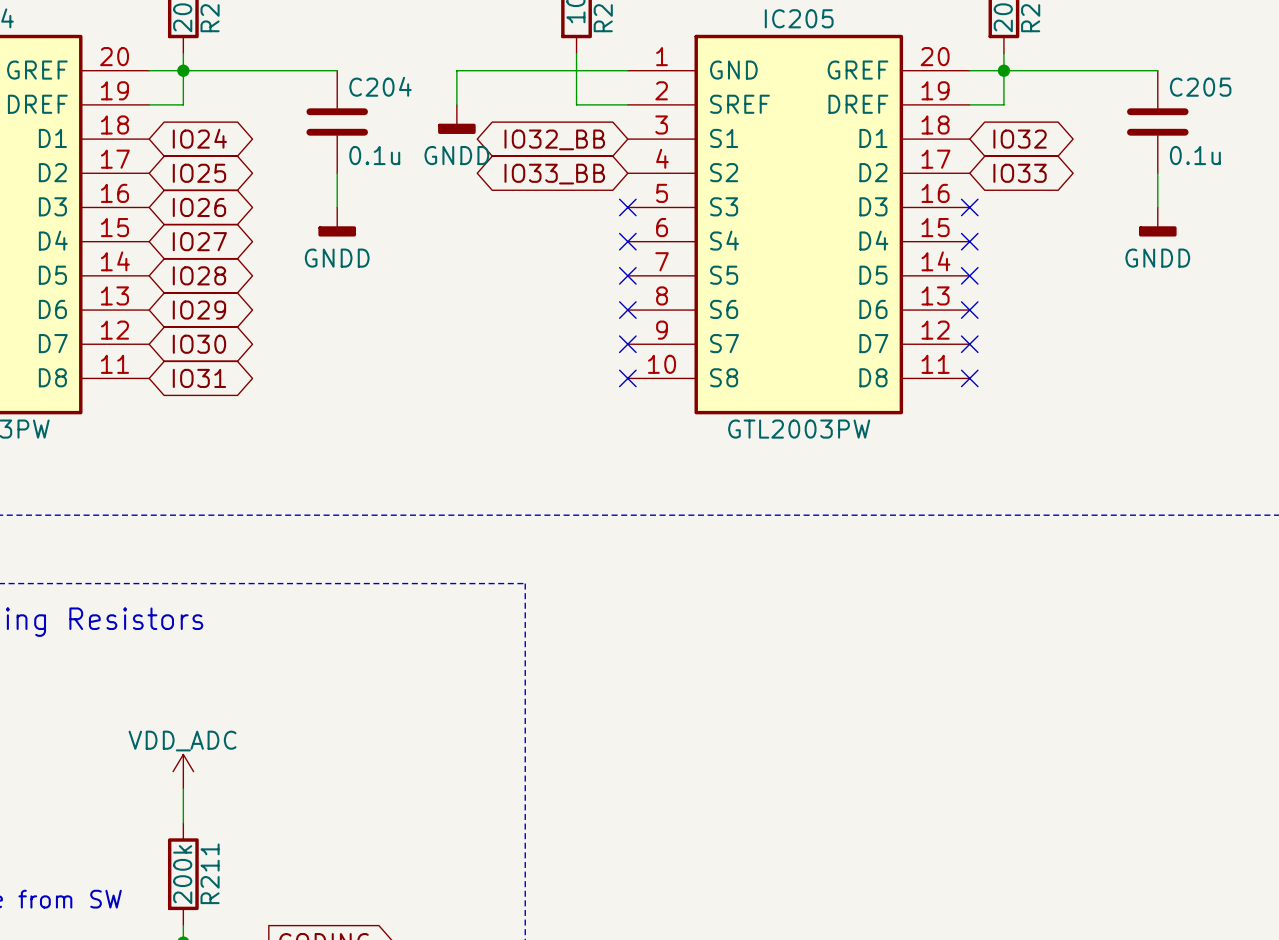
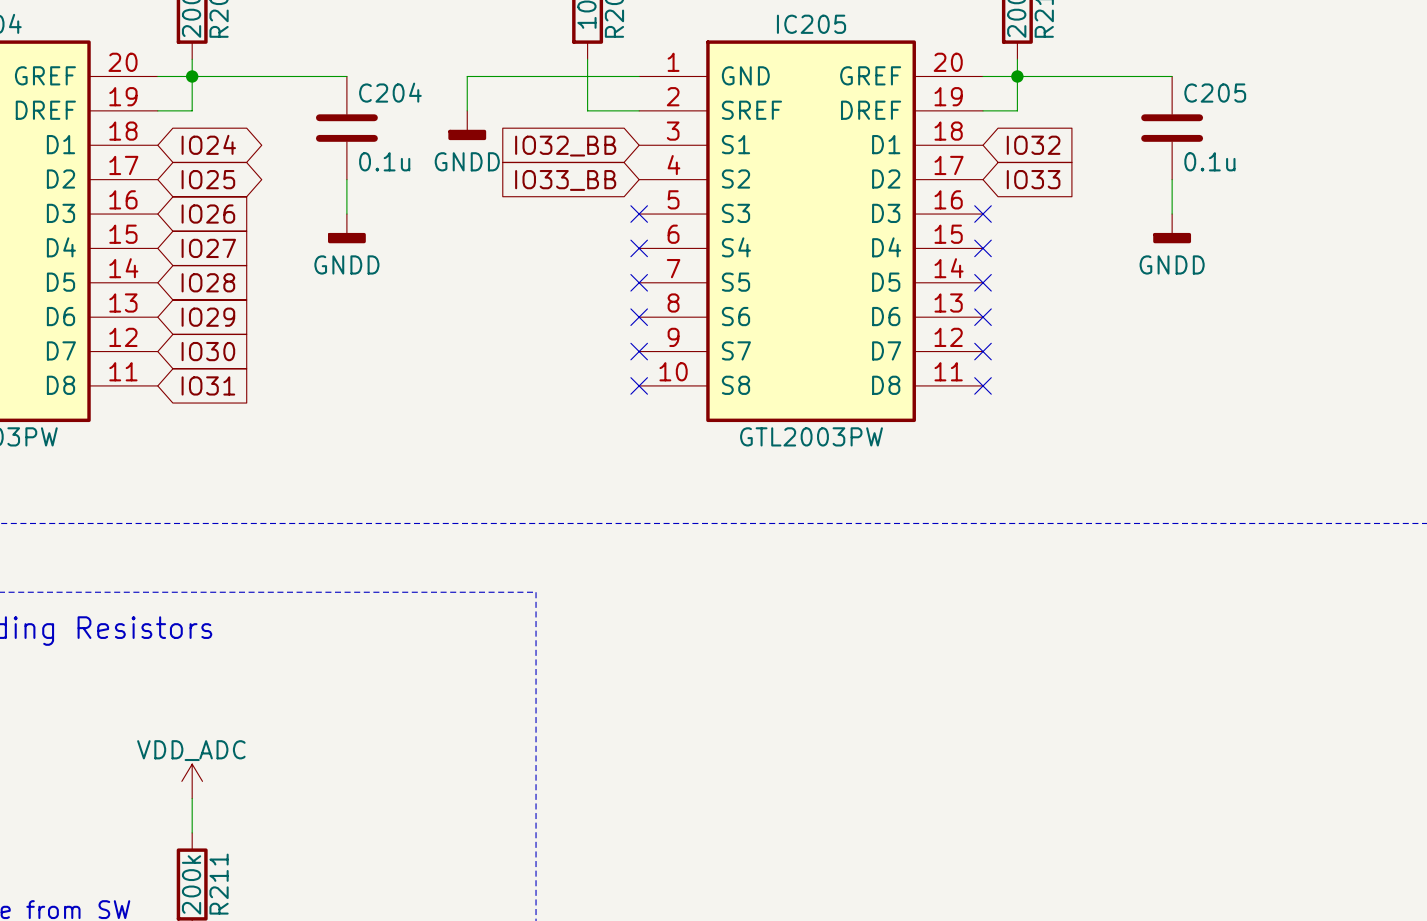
global label shape: bidirectional (554, 139) -> input (565, 146)
global label shape: bidirectional (1020, 139) -> input (1033, 145)
global label shape: bidirectional (1020, 173) -> input (1033, 179)
global label shape: bidirectional (554, 174) -> input (565, 180)
global label shape: bidirectional (199, 207) -> input (208, 214)
global label shape: bidirectional (199, 241) -> input (208, 248)
global label shape: bidirectional (199, 275) -> input (208, 282)
global label shape: bidirectional (199, 310) -> input (208, 317)
global label shape: bidirectional (199, 344) -> input (208, 351)
global label shape: bidirectional (199, 378) -> input (208, 385)

